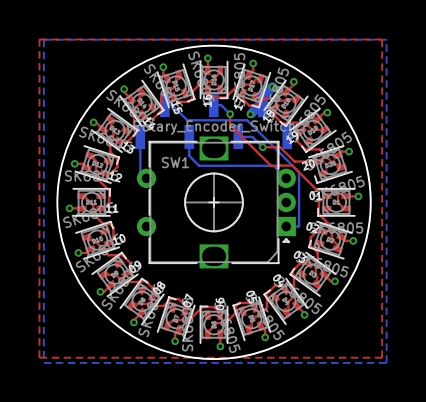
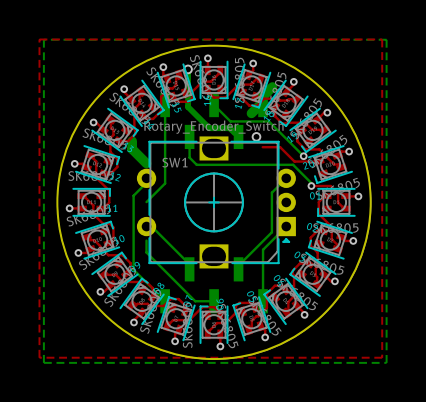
via: none -> (188, 69)
via: (272, 86) -> none
part footprint: [135, 92, 293, 150] -> [160, 92, 268, 150]
bottom track: (164, 105) (172, 105) (187, 120) (247, 120) (299, 172) (299, 225) (286, 226) -> (165, 105) (165, 183) (146, 202)
bottom track: (213, 105) (221, 105) (230, 114) -> (214, 105) (230, 121) (268, 121) (303, 156)
top track: (230, 114) (230, 124) (271, 165) (292, 165) (316, 190) (334, 190) (338, 194) -> (311, 186) (330, 186) (338, 194)
via: (230, 114) -> none
via: (250, 114) -> none
bottom track: (140, 136) (140, 172) (146, 178) -> none
bottom track: (189, 136) (189, 155) (199, 165) (273, 165) (286, 178) -> (189, 136) (189, 157) (196, 164) (293, 164) (311, 183) (311, 186)
bottom track: (238, 136) (252, 136) (262, 147) -> (238, 136) (229, 128) (209, 128) (188, 107) (188, 69)
via: none -> (256, 136)
bottom track: none -> (132, 141) (132, 149) (146, 163)
via: (262, 147) -> none
via: none -> (303, 156)
bottom track: none -> (286, 178) (271, 192) (271, 232) (238, 265) (238, 269)
bottom track: none -> (146, 182) (133, 195) (133, 269) (165, 301)
via: none -> (311, 186)
bottom track: none -> (146, 221) (189, 264) (189, 269)
bottom track: none -> (286, 226) (263, 249) (263, 301)
bottom track: none -> (146, 240) (146, 252) (195, 301) (214, 301)
part: none -> (214, 285)

